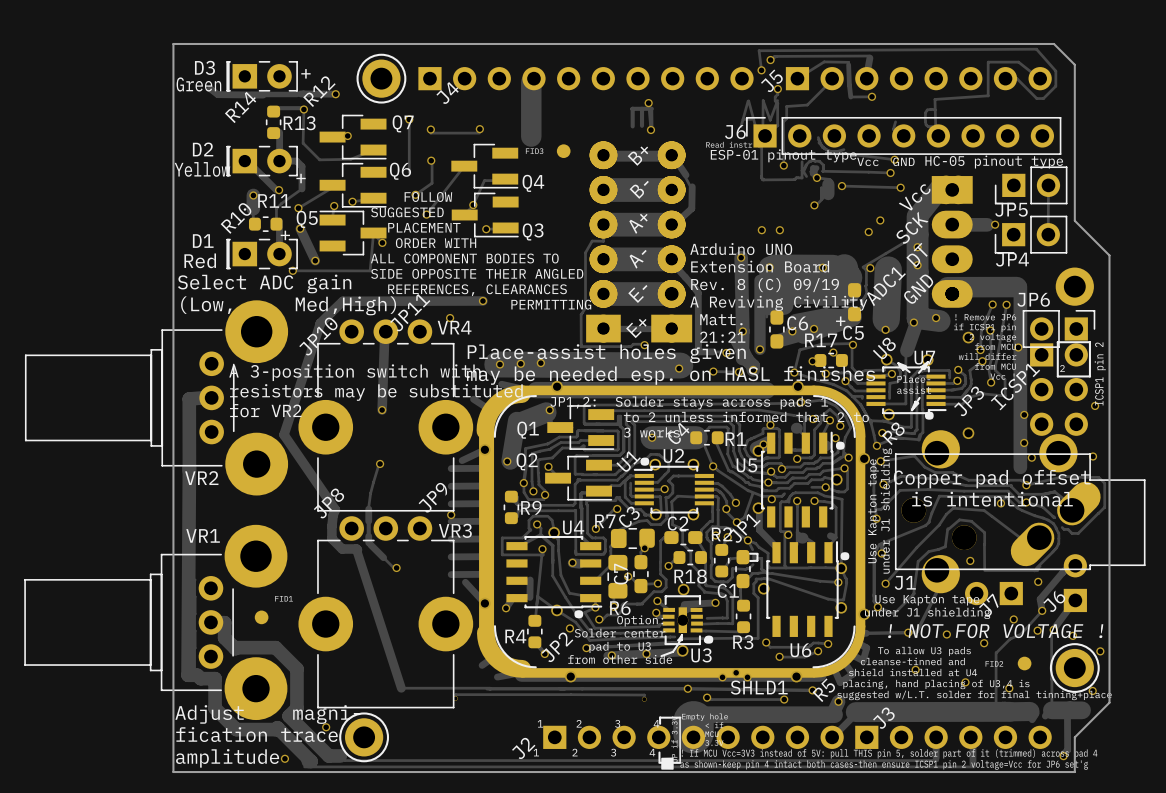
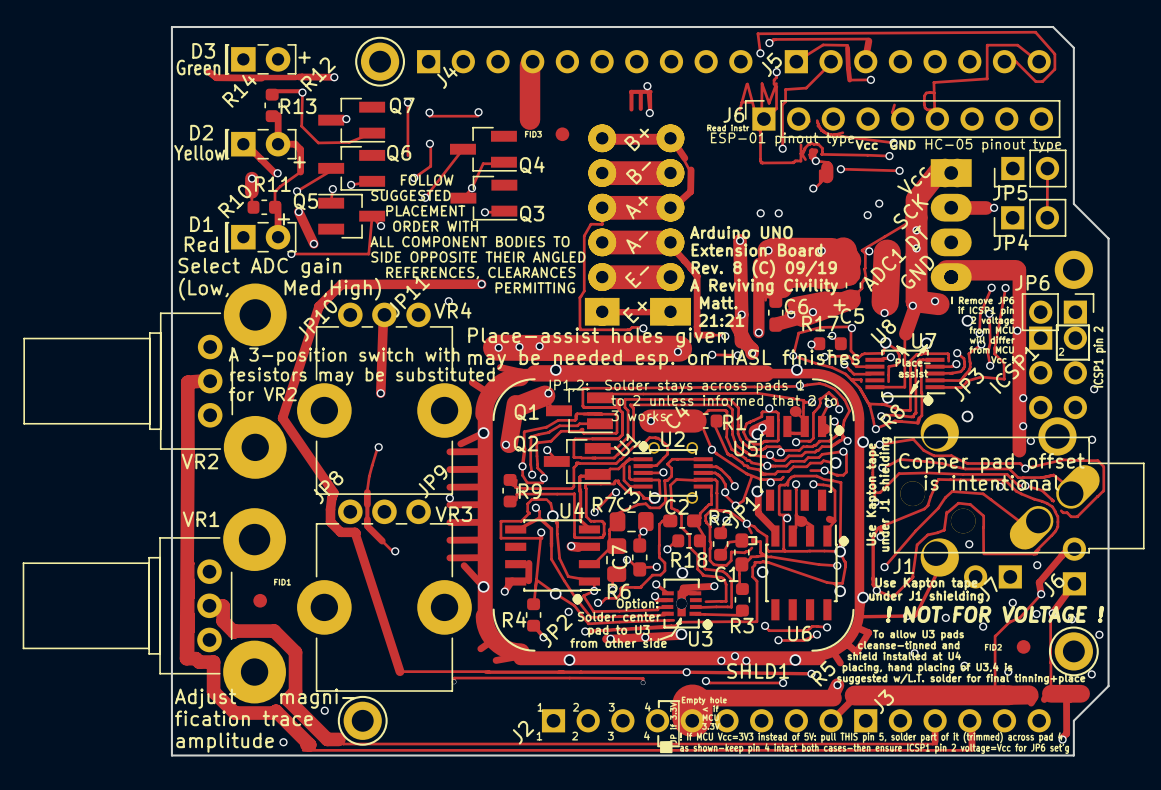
track: none -> (863, 597) (856, 627) (868, 632) (856, 652) (848, 644) (832, 650) (840, 663)
track: (866, 633) (862, 633) (858, 640) (858, 643) (866, 647) (863, 660) (853, 655) (844, 661) (852, 674) (840, 682) (834, 669) -> none

